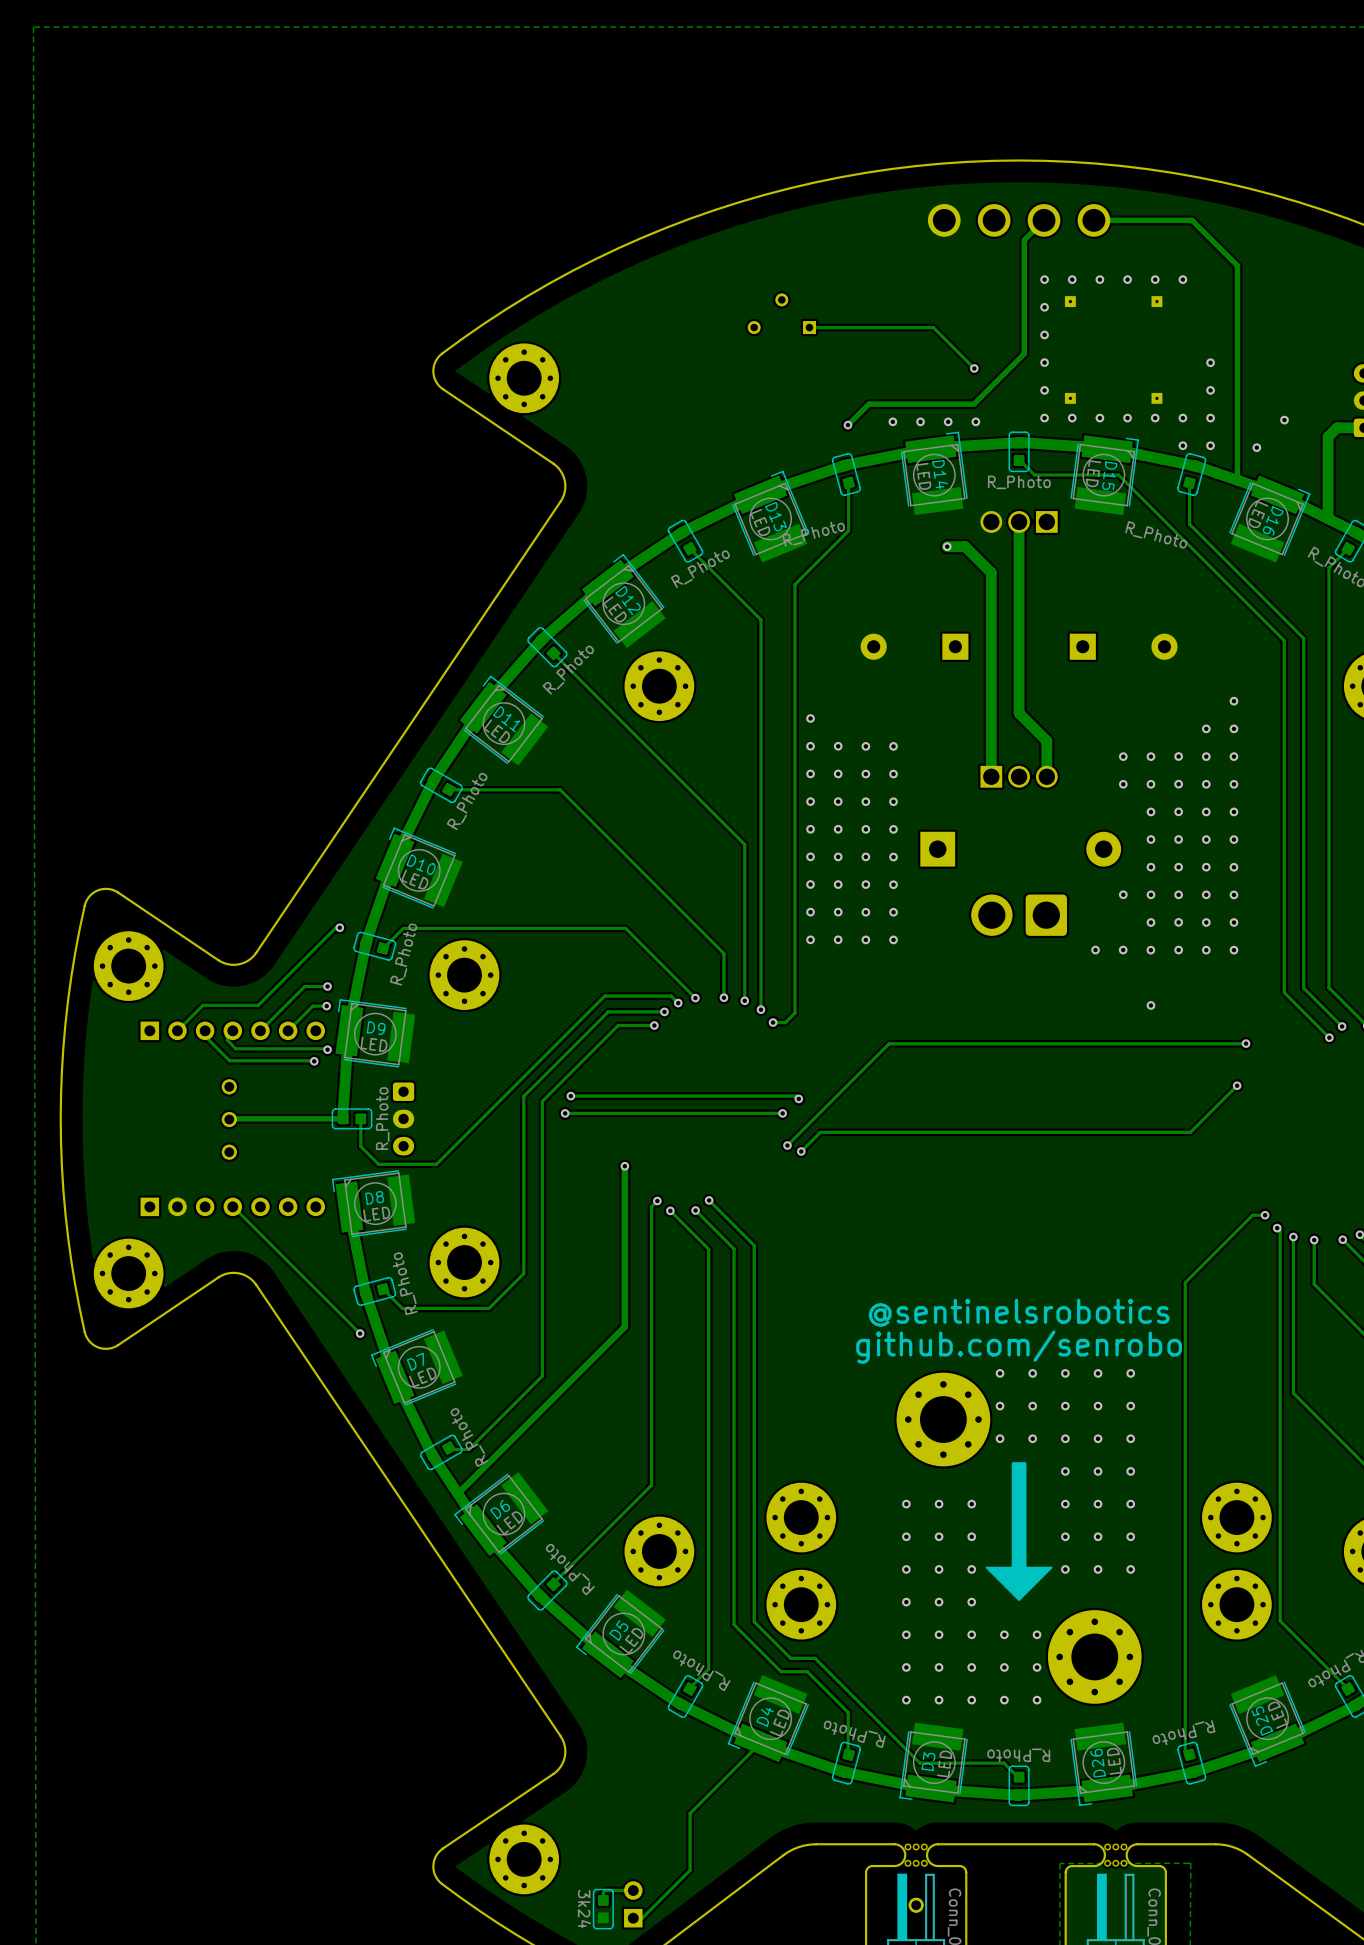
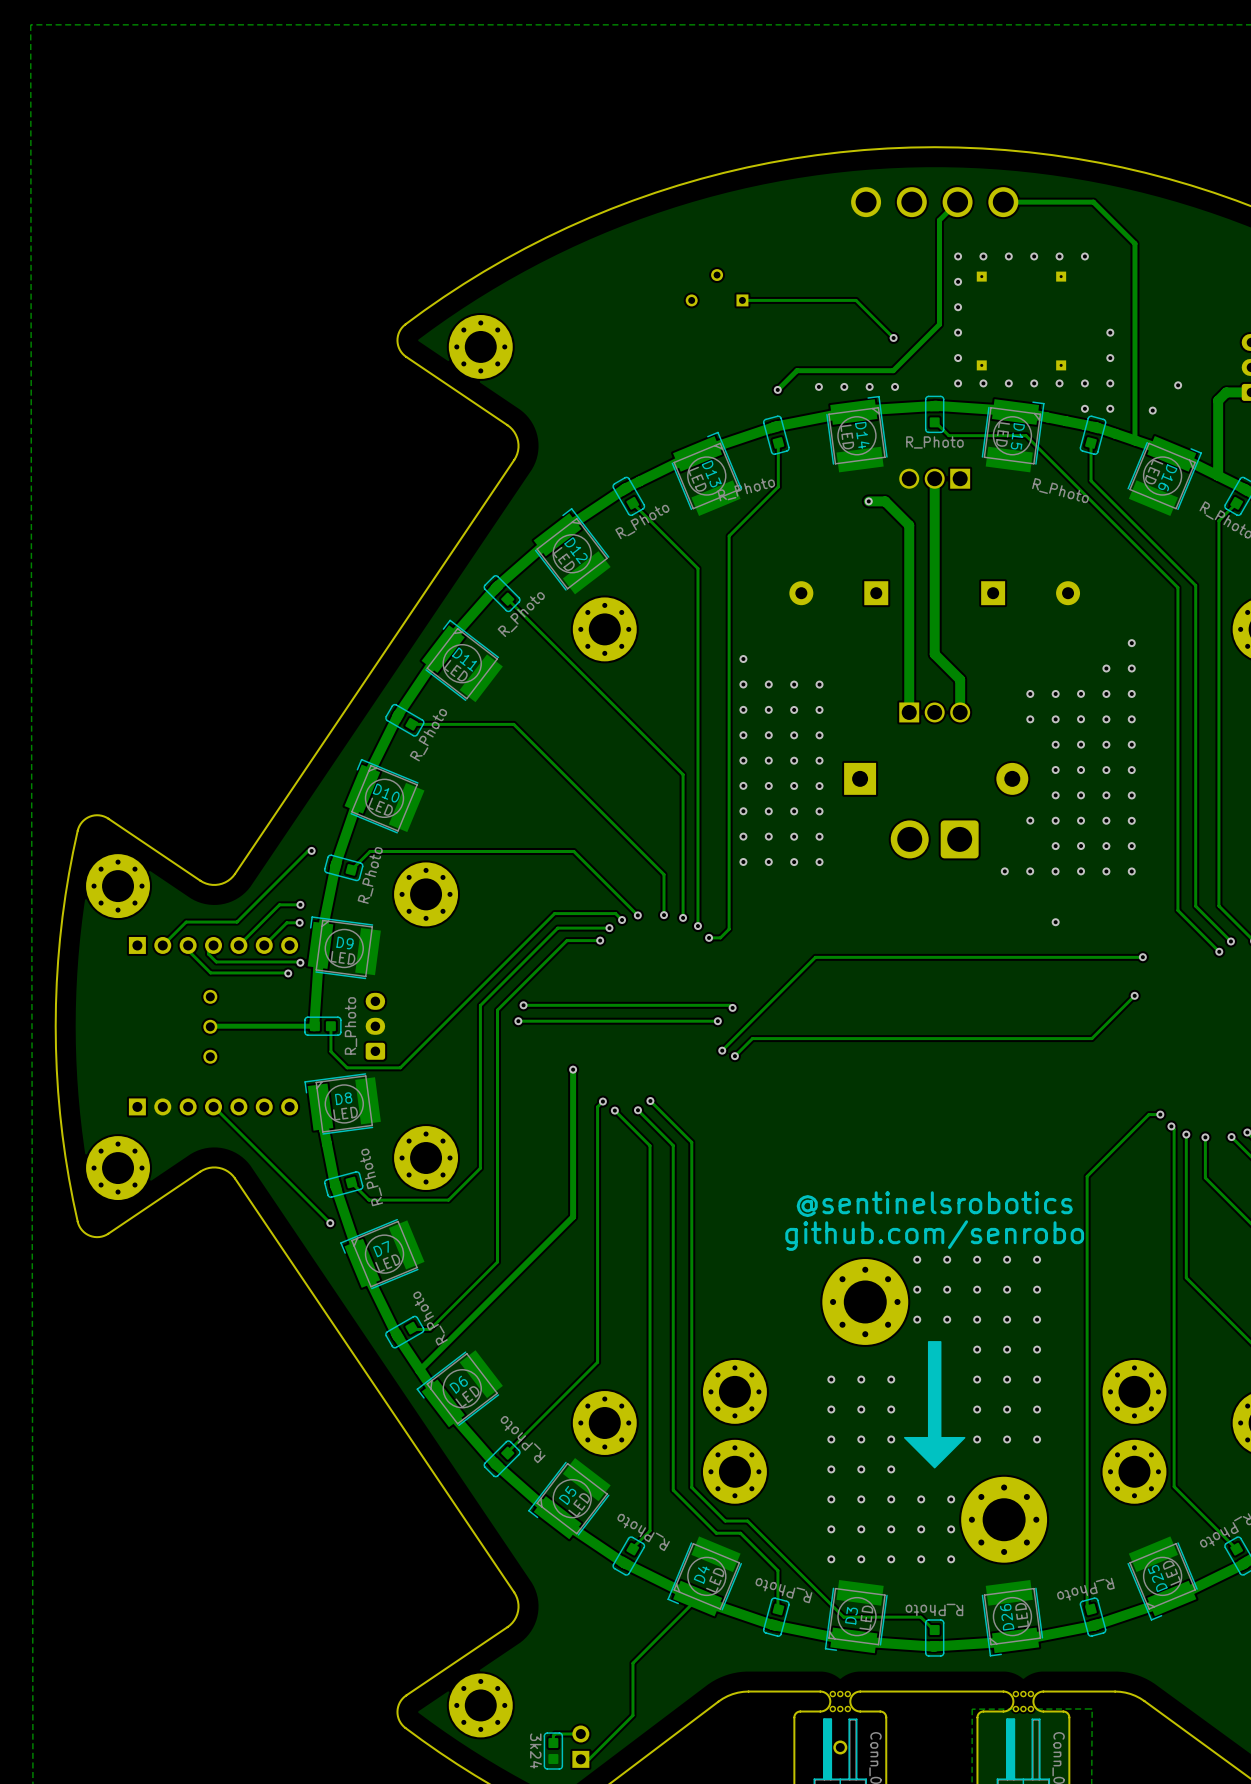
part rotation: 0° (403, 1118) -> 180° (375, 1026)

